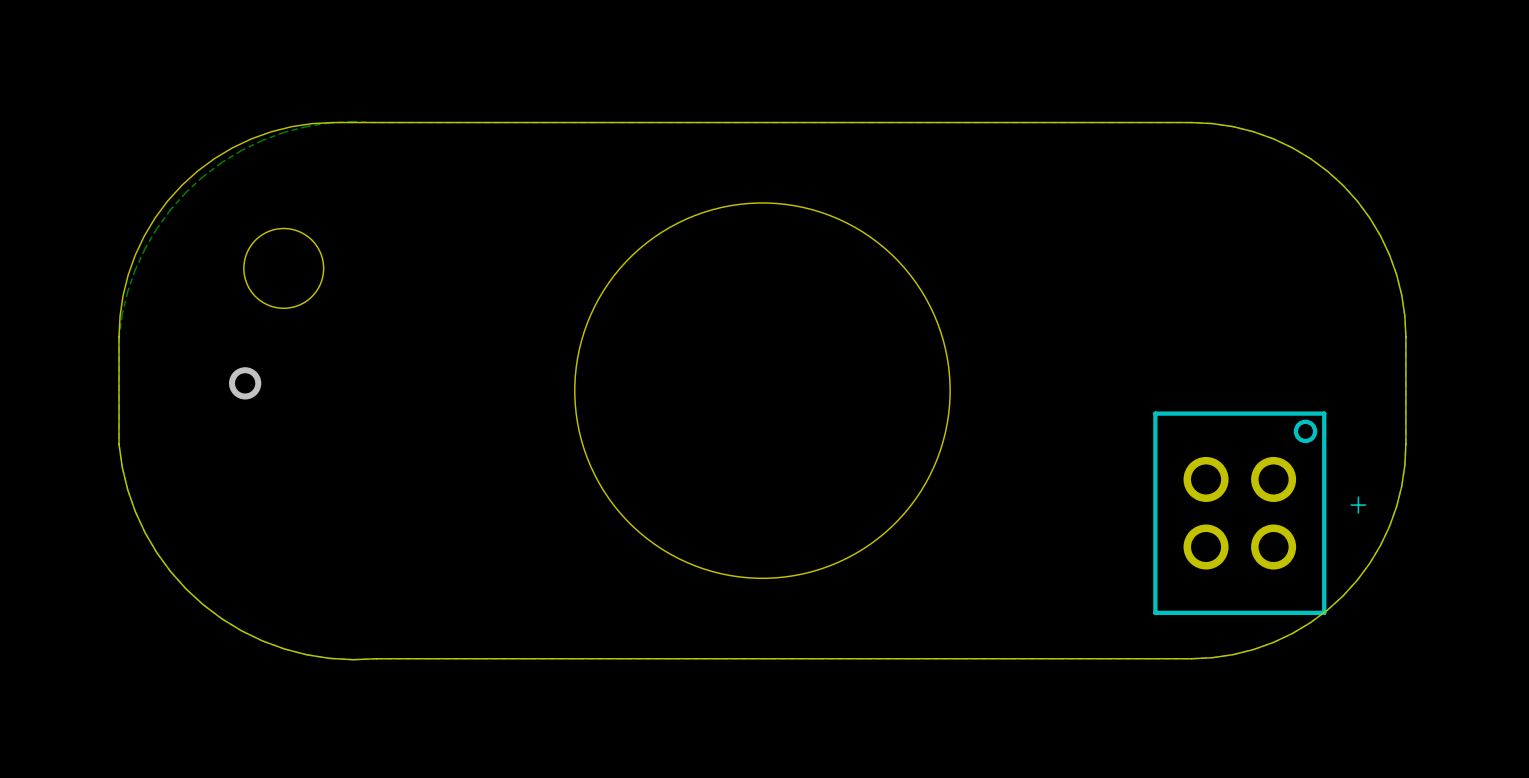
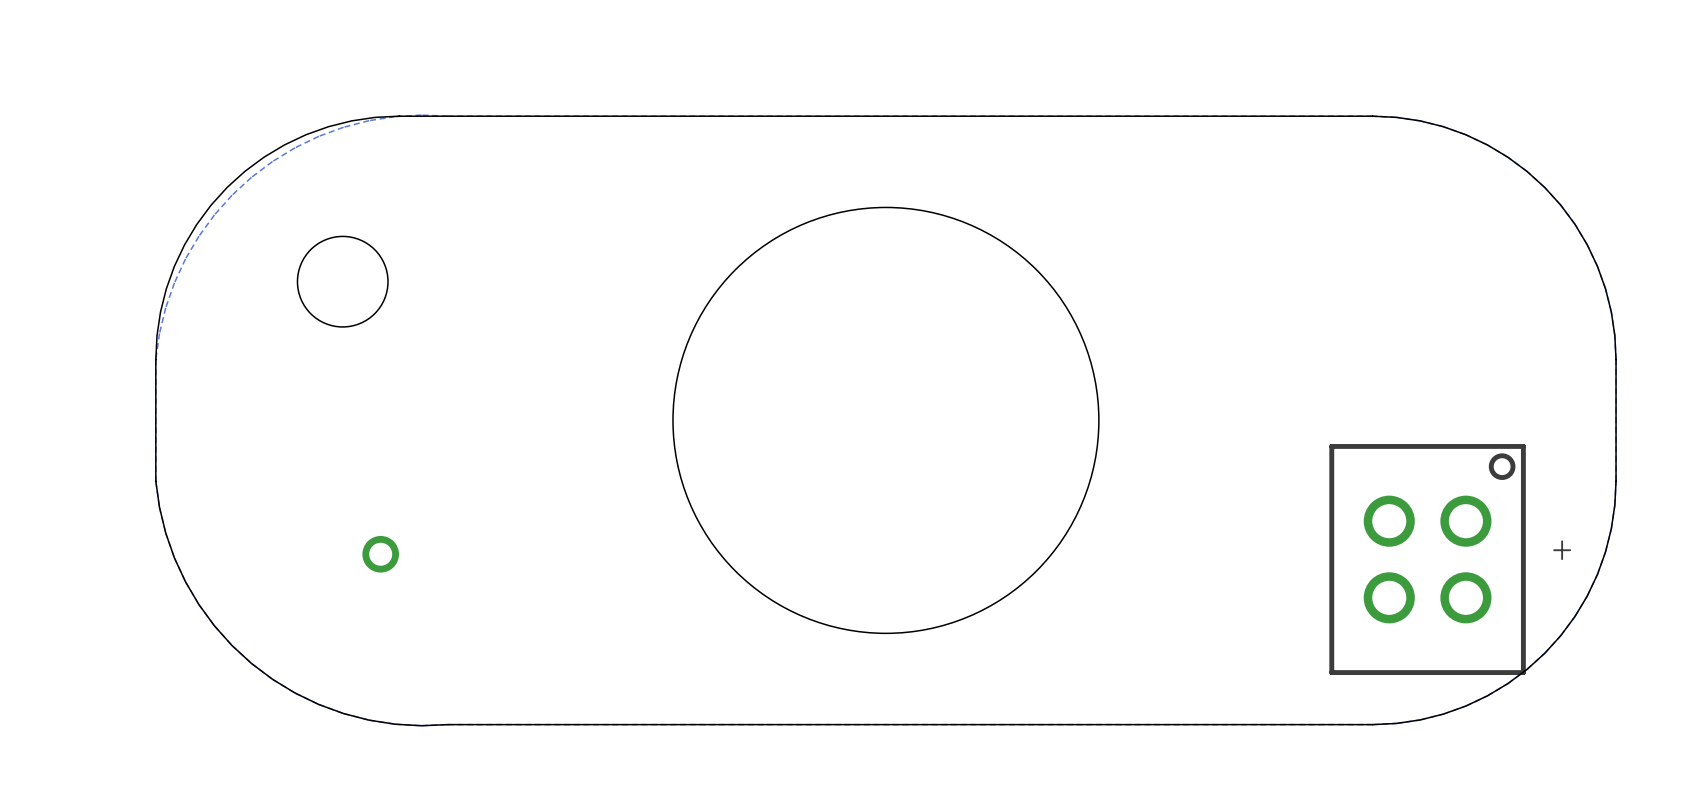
via position: (245, 383) -> (380, 554)

